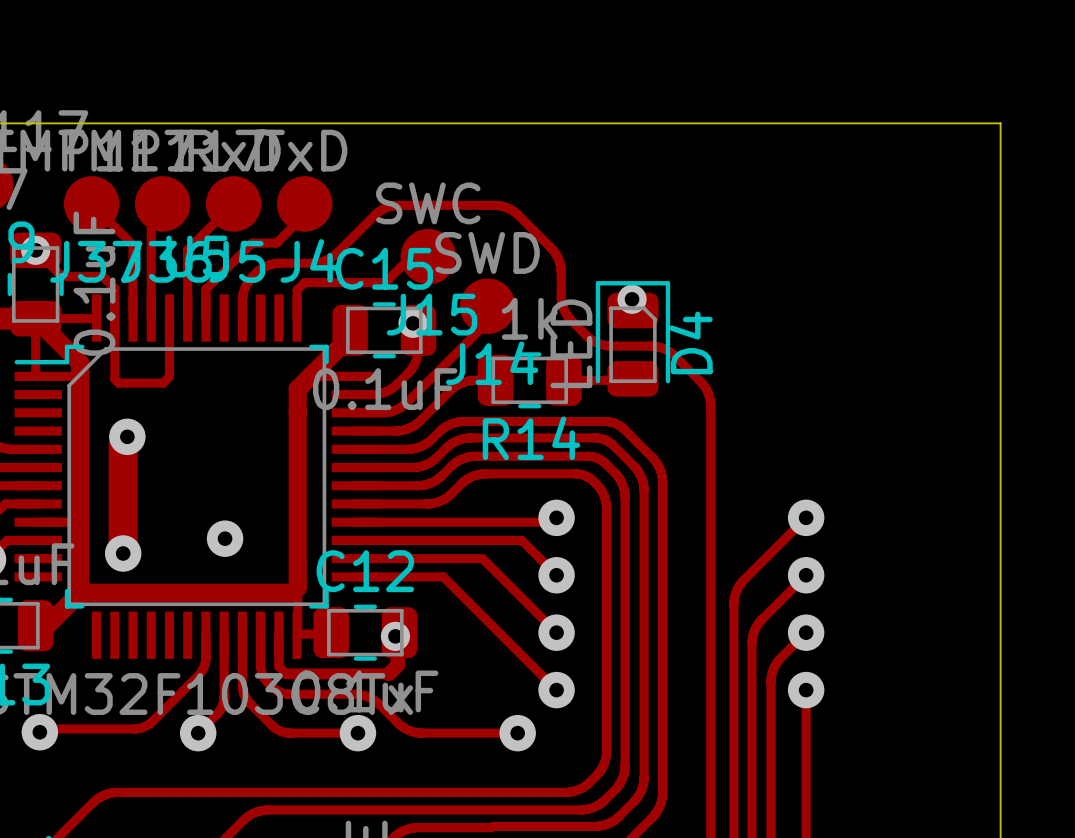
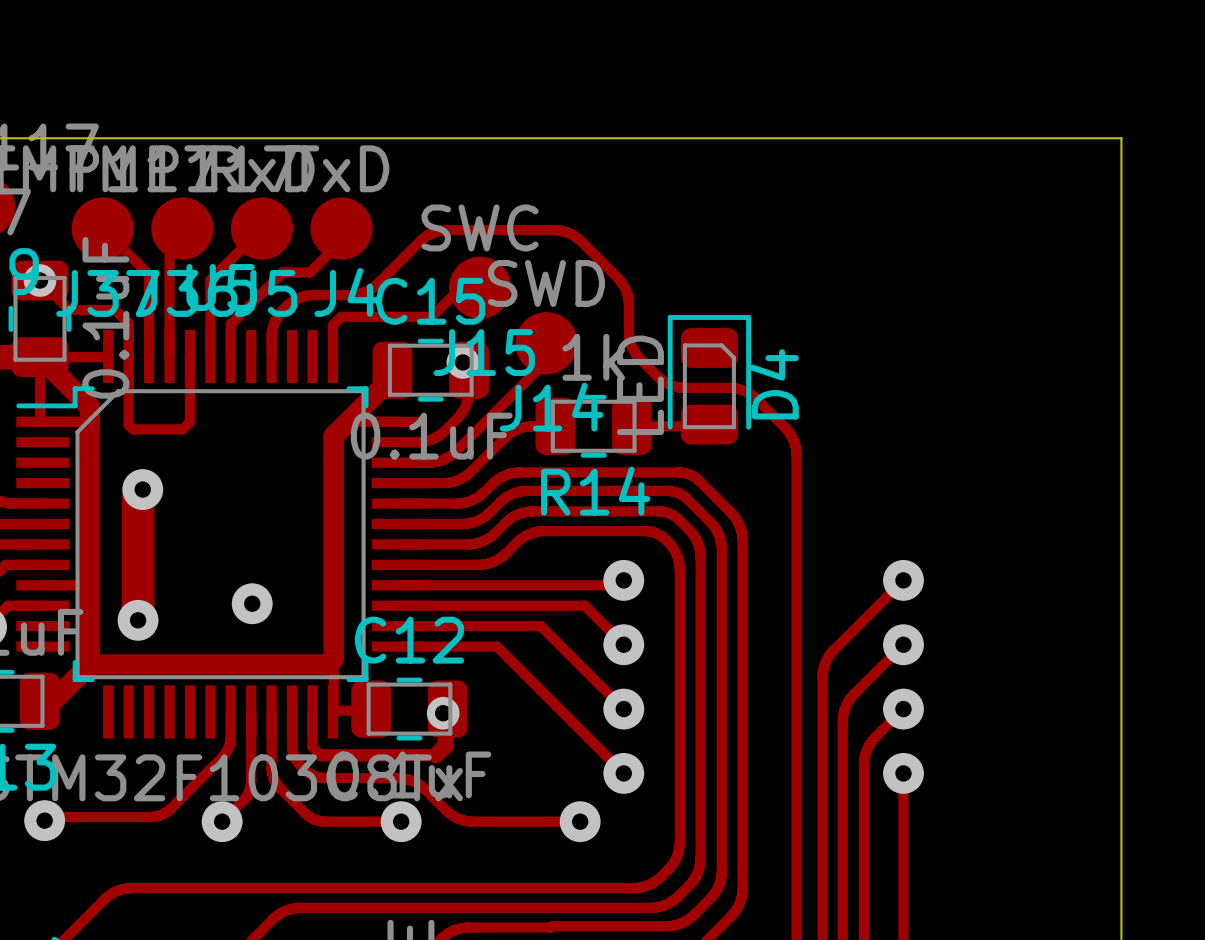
via: (632, 299) -> none

